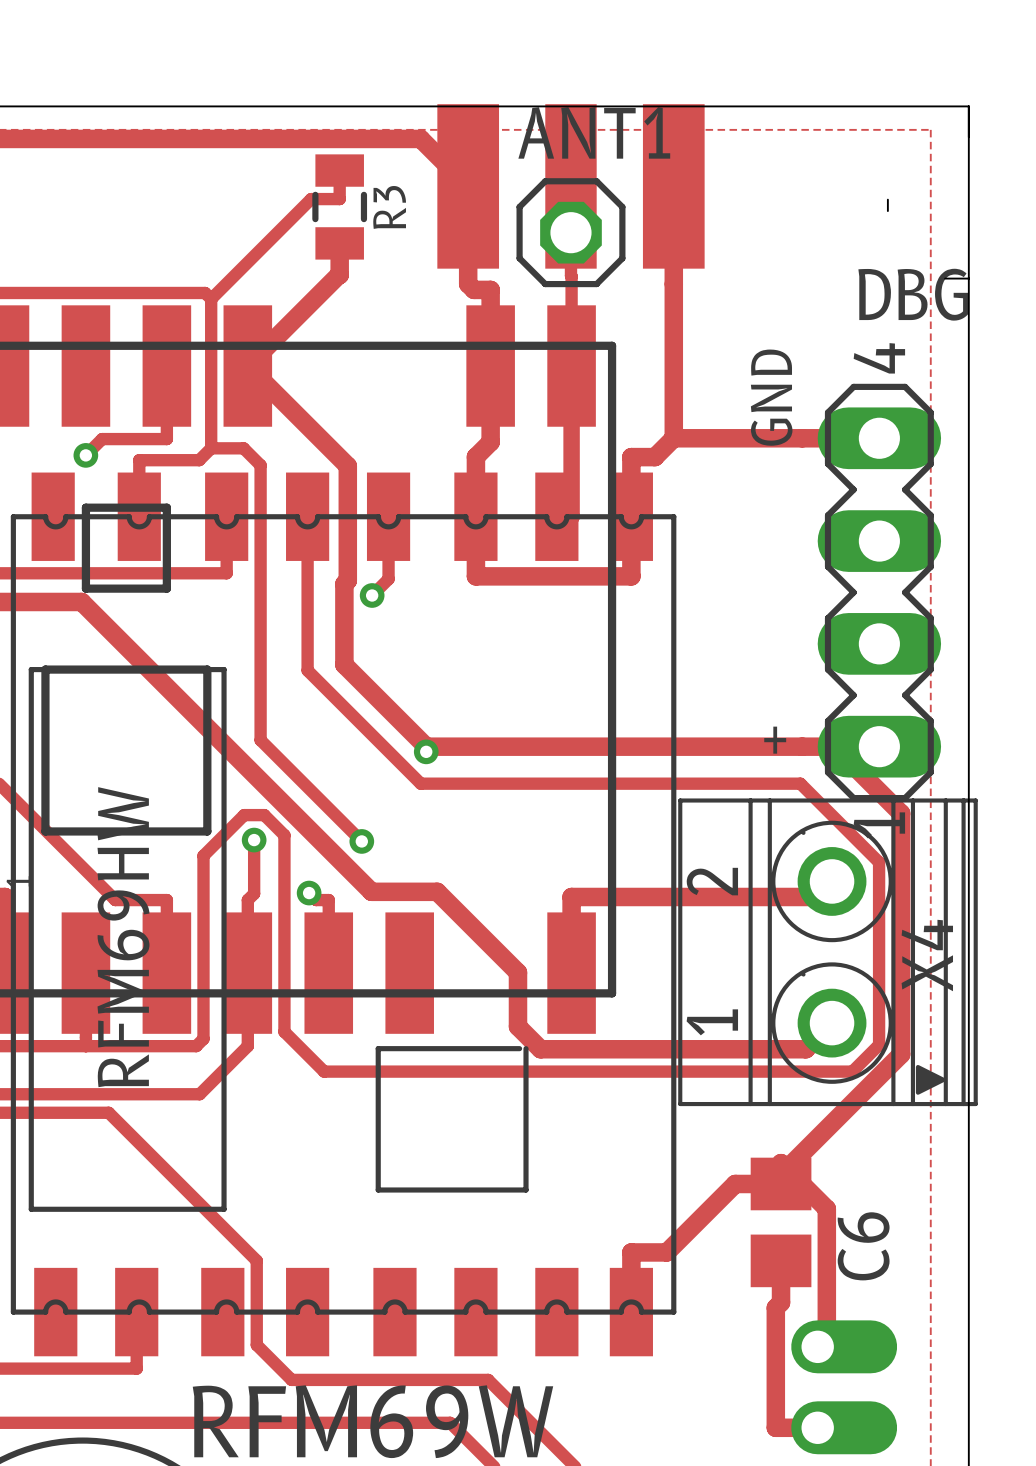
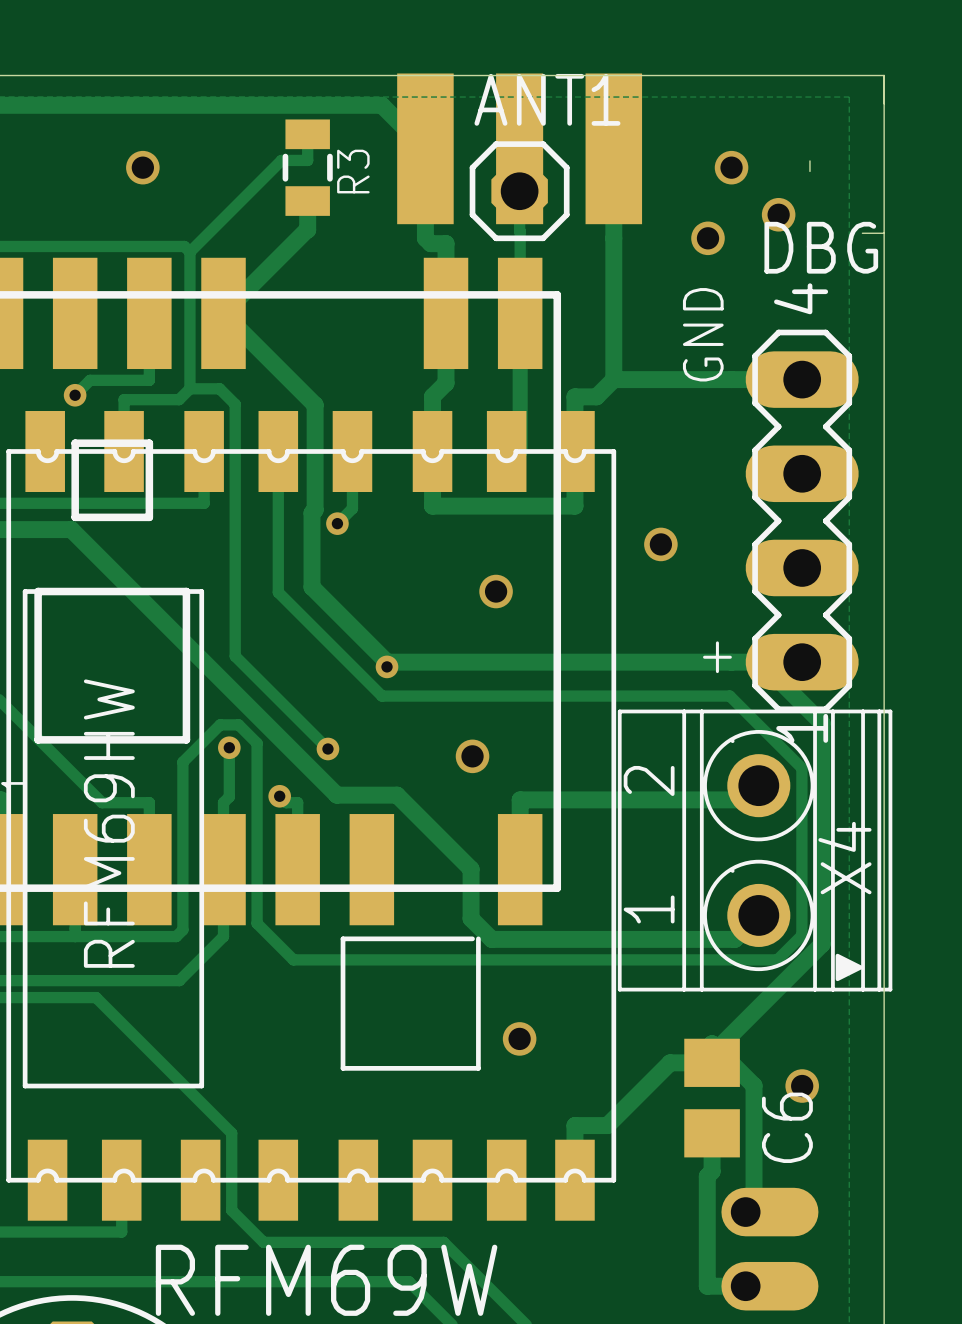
via: none -> (142, 167)
via: none -> (731, 167)
via: none -> (778, 214)
via: none -> (708, 238)
via: none -> (660, 544)
via: none -> (496, 591)
via: none -> (472, 756)
via: none -> (519, 1038)
via: none -> (802, 1086)

